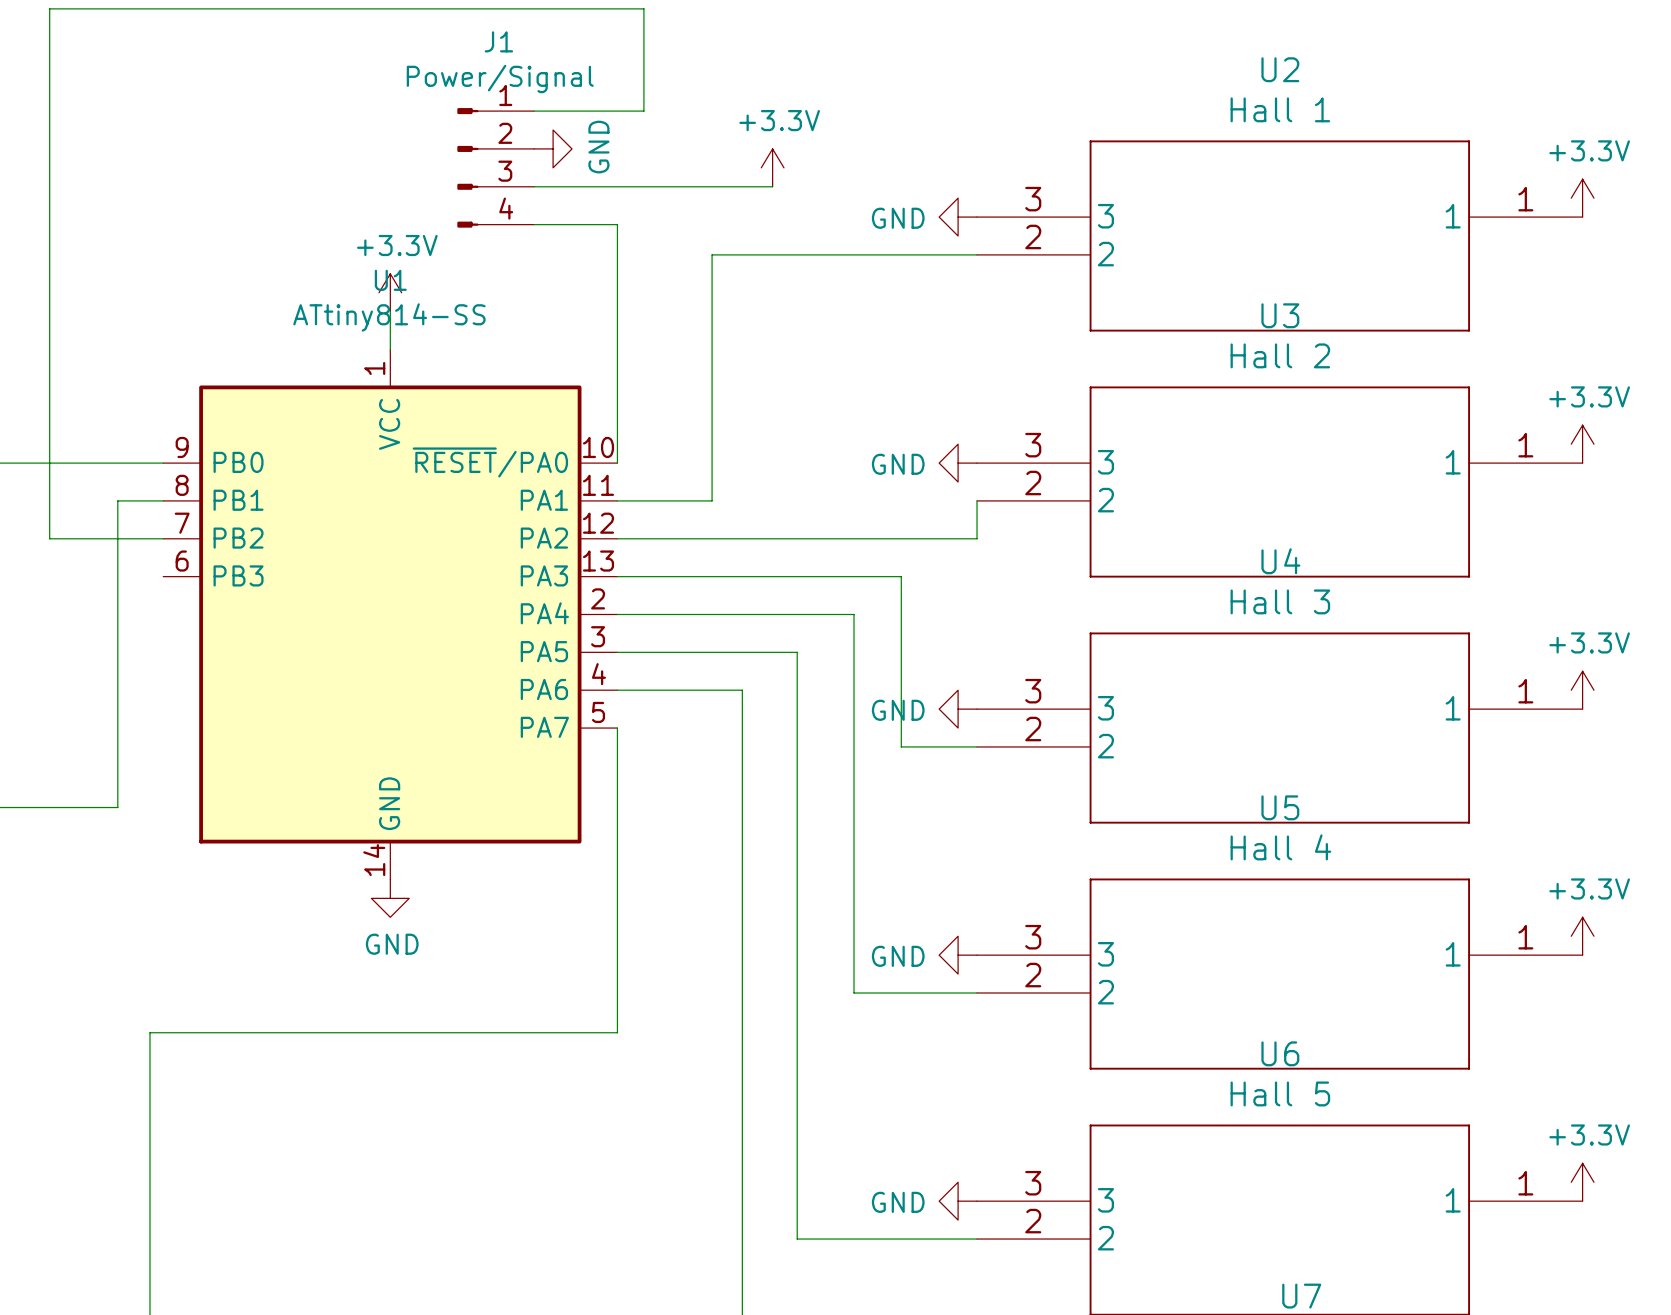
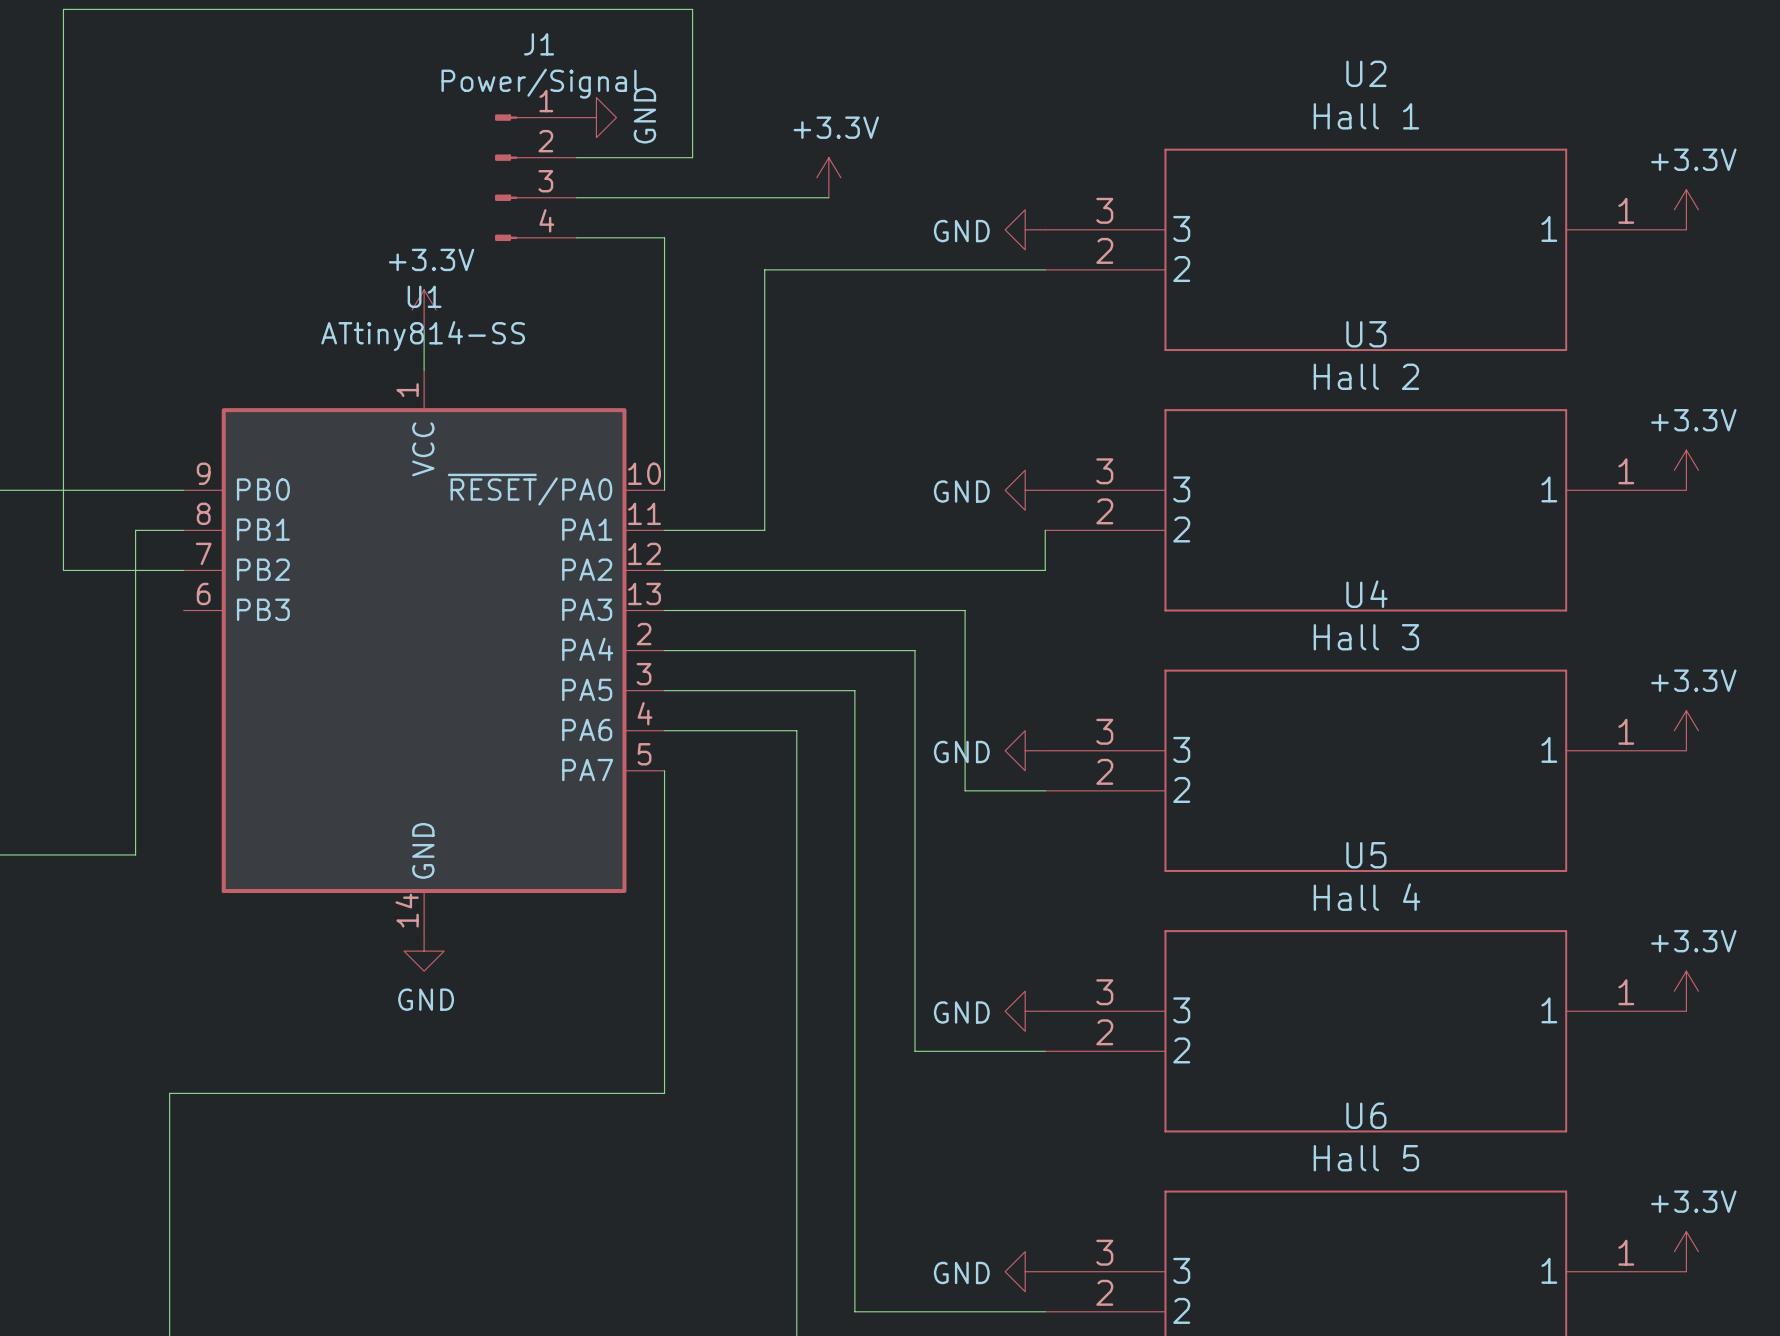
wire: (534, 111) (643, 111) -> (576, 157) (692, 157) (692, 117)
power symbol position: GND (553, 148) -> GND (596, 117)

